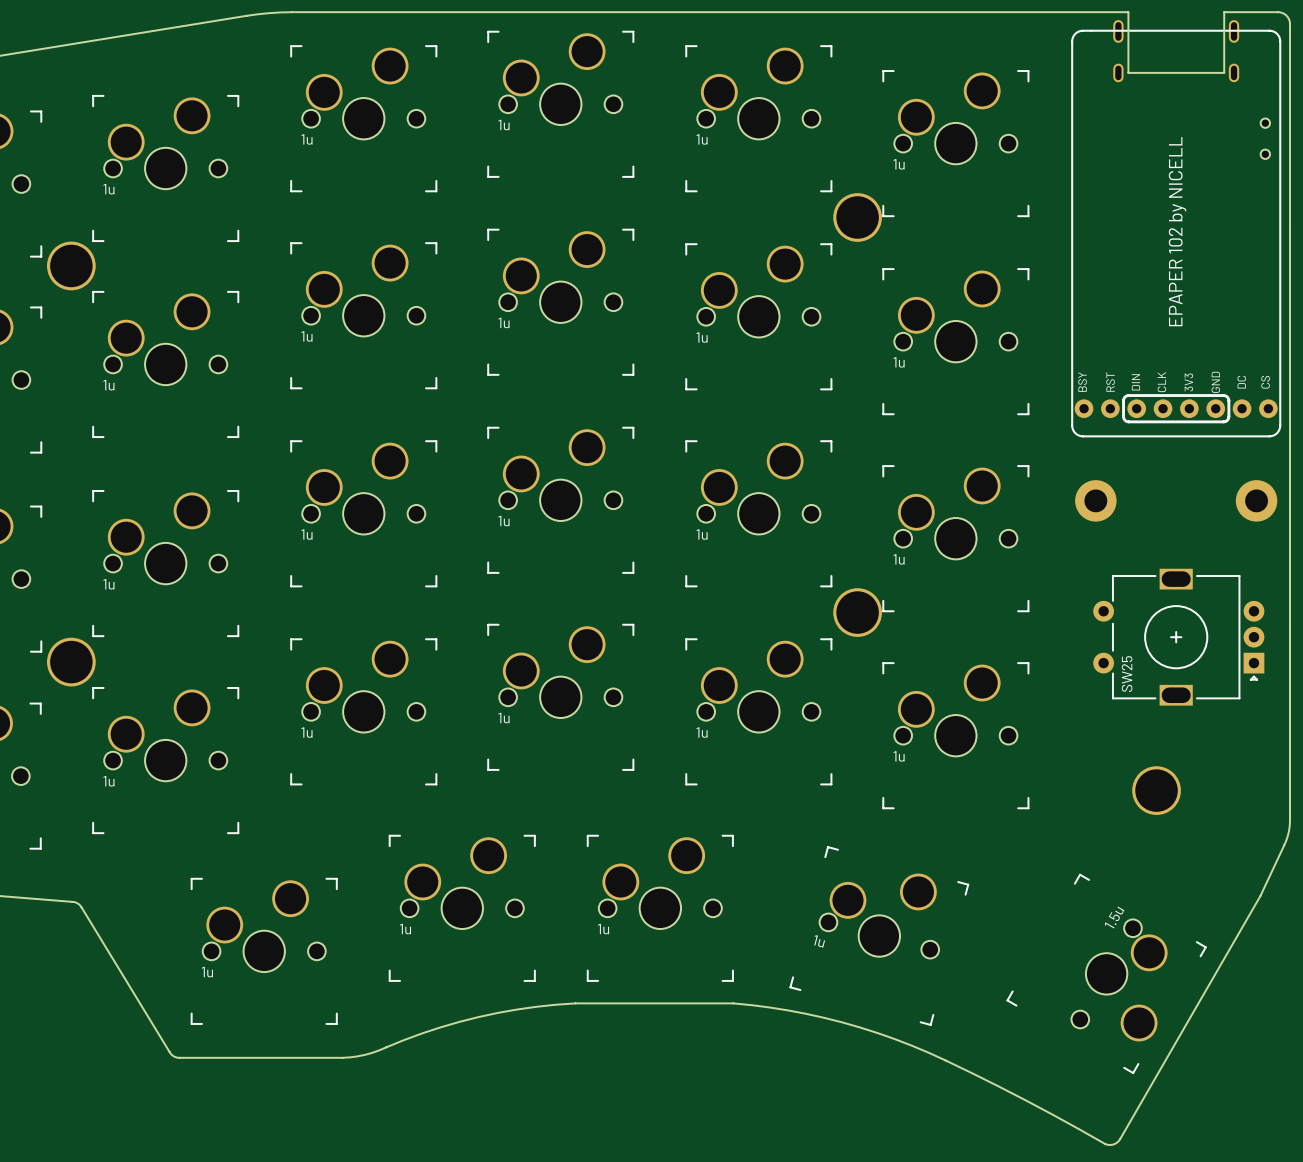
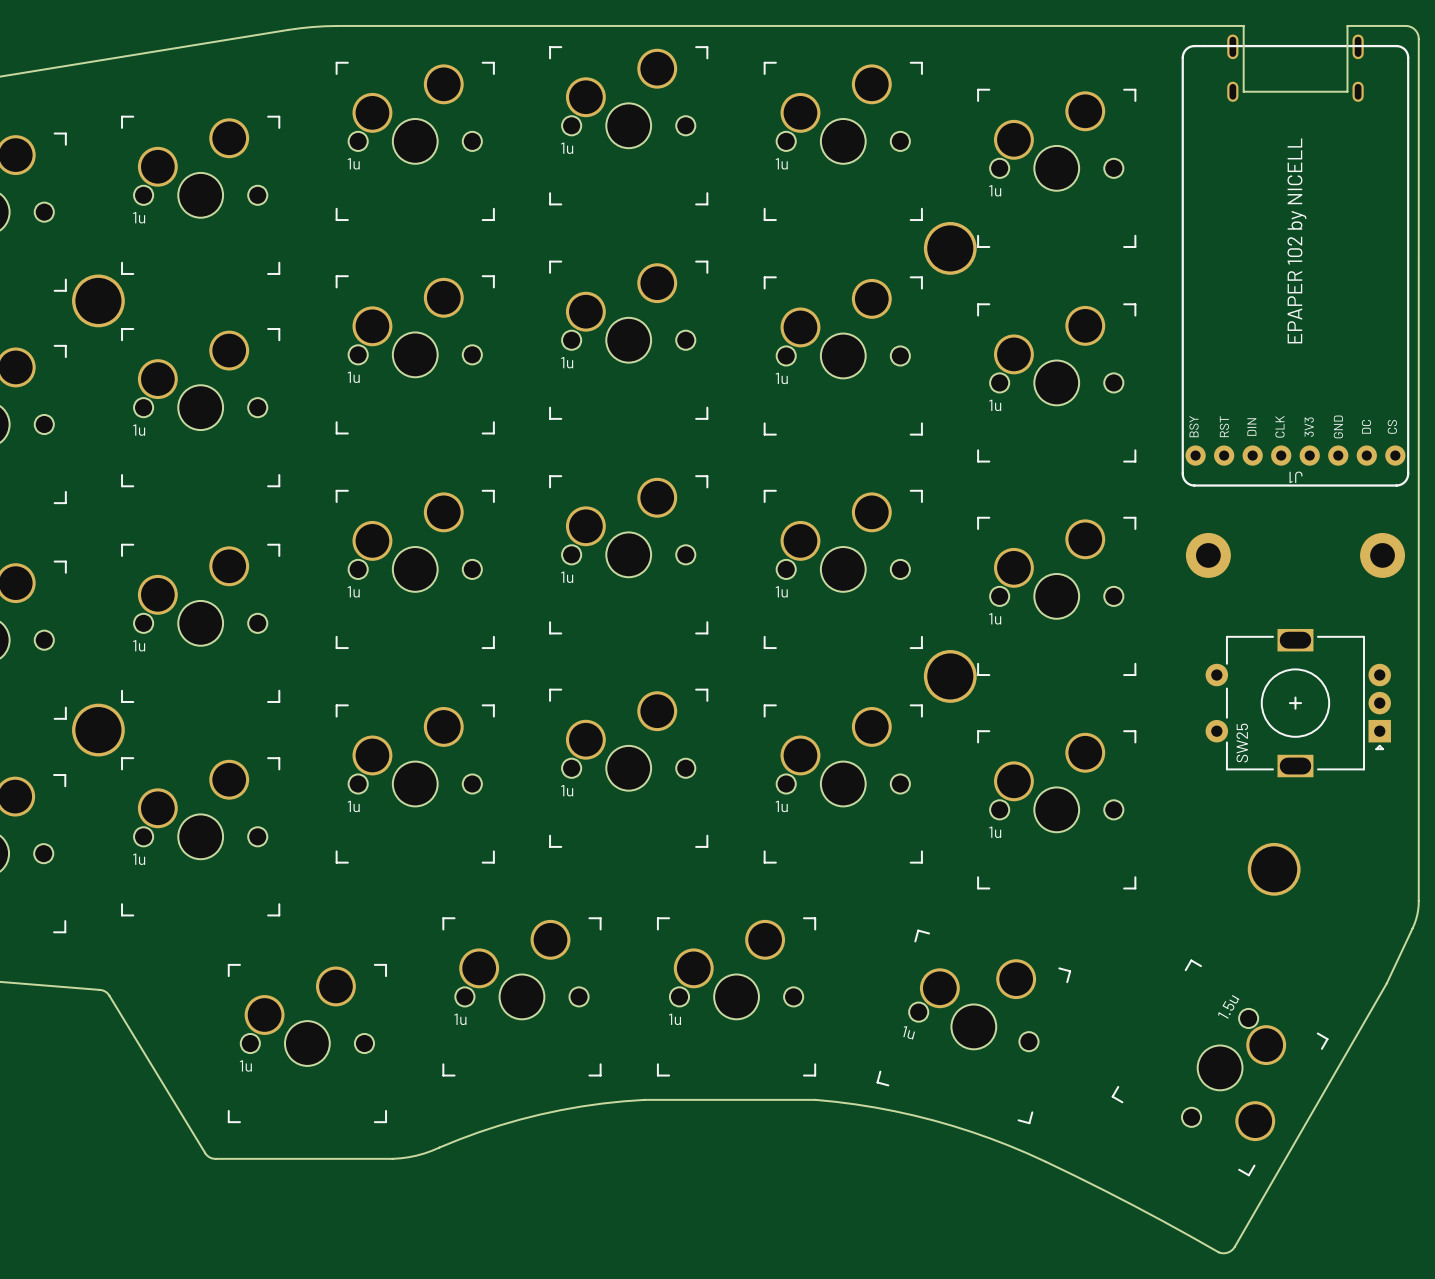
part: (1265, 138) -> none
part: (1176, 233) -> none
J1: none -> (1295, 265)

